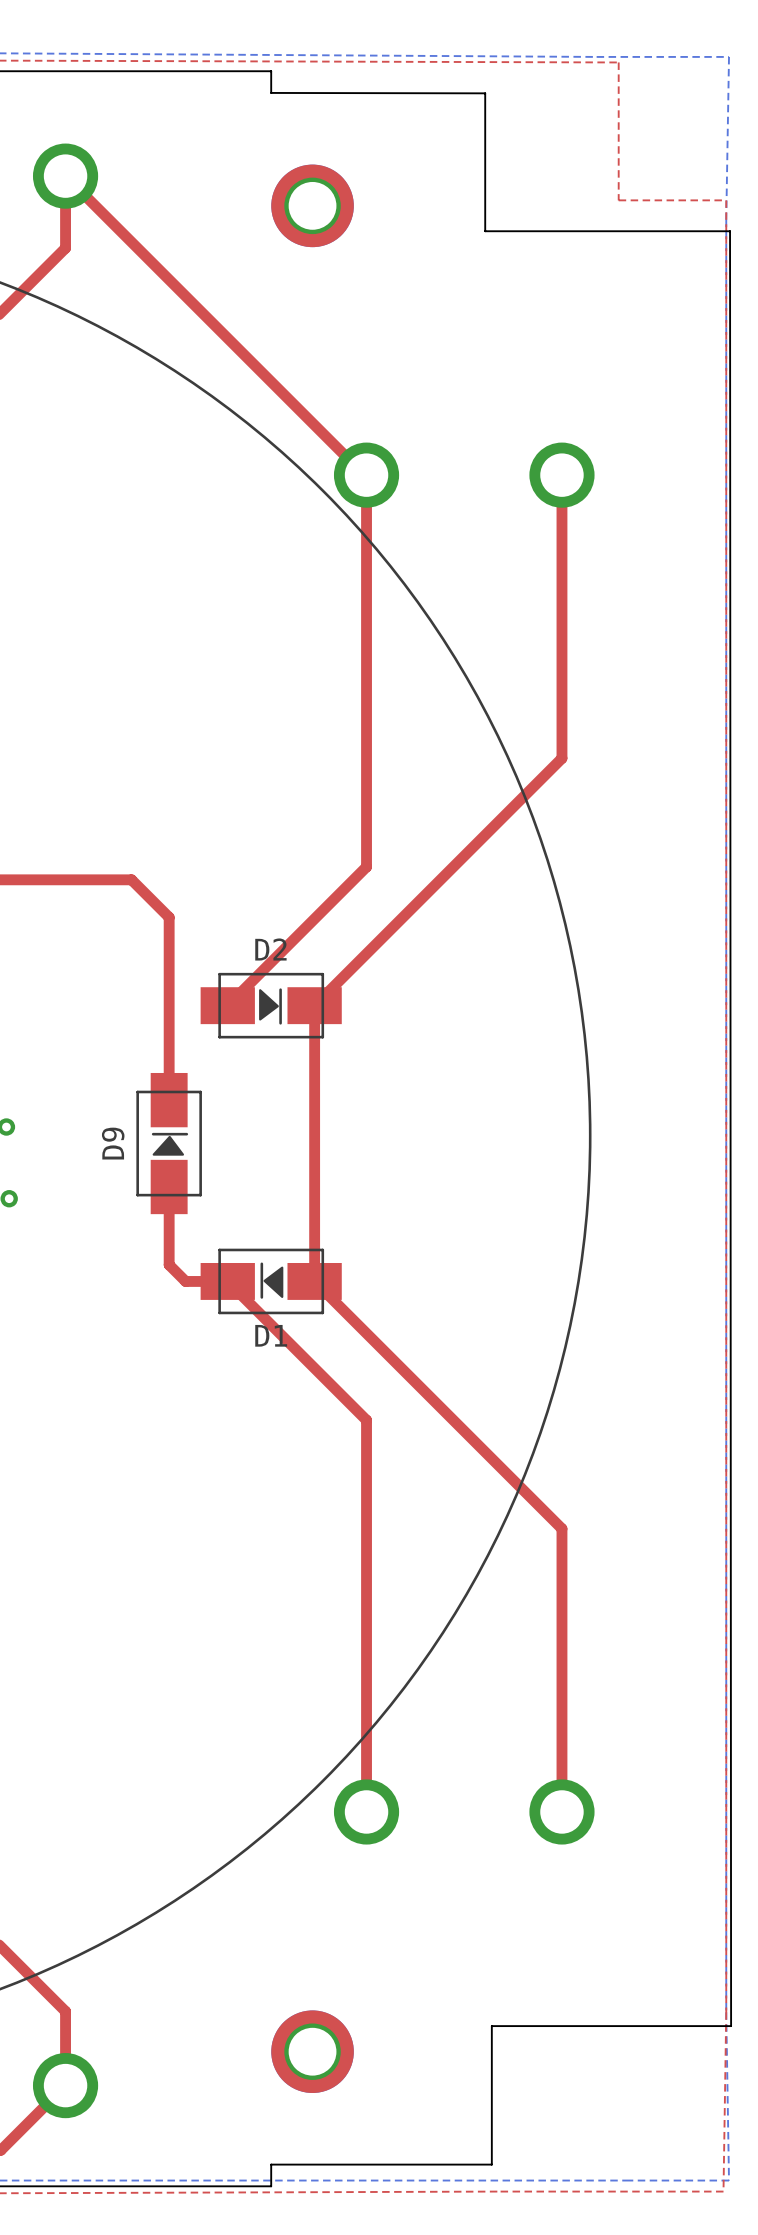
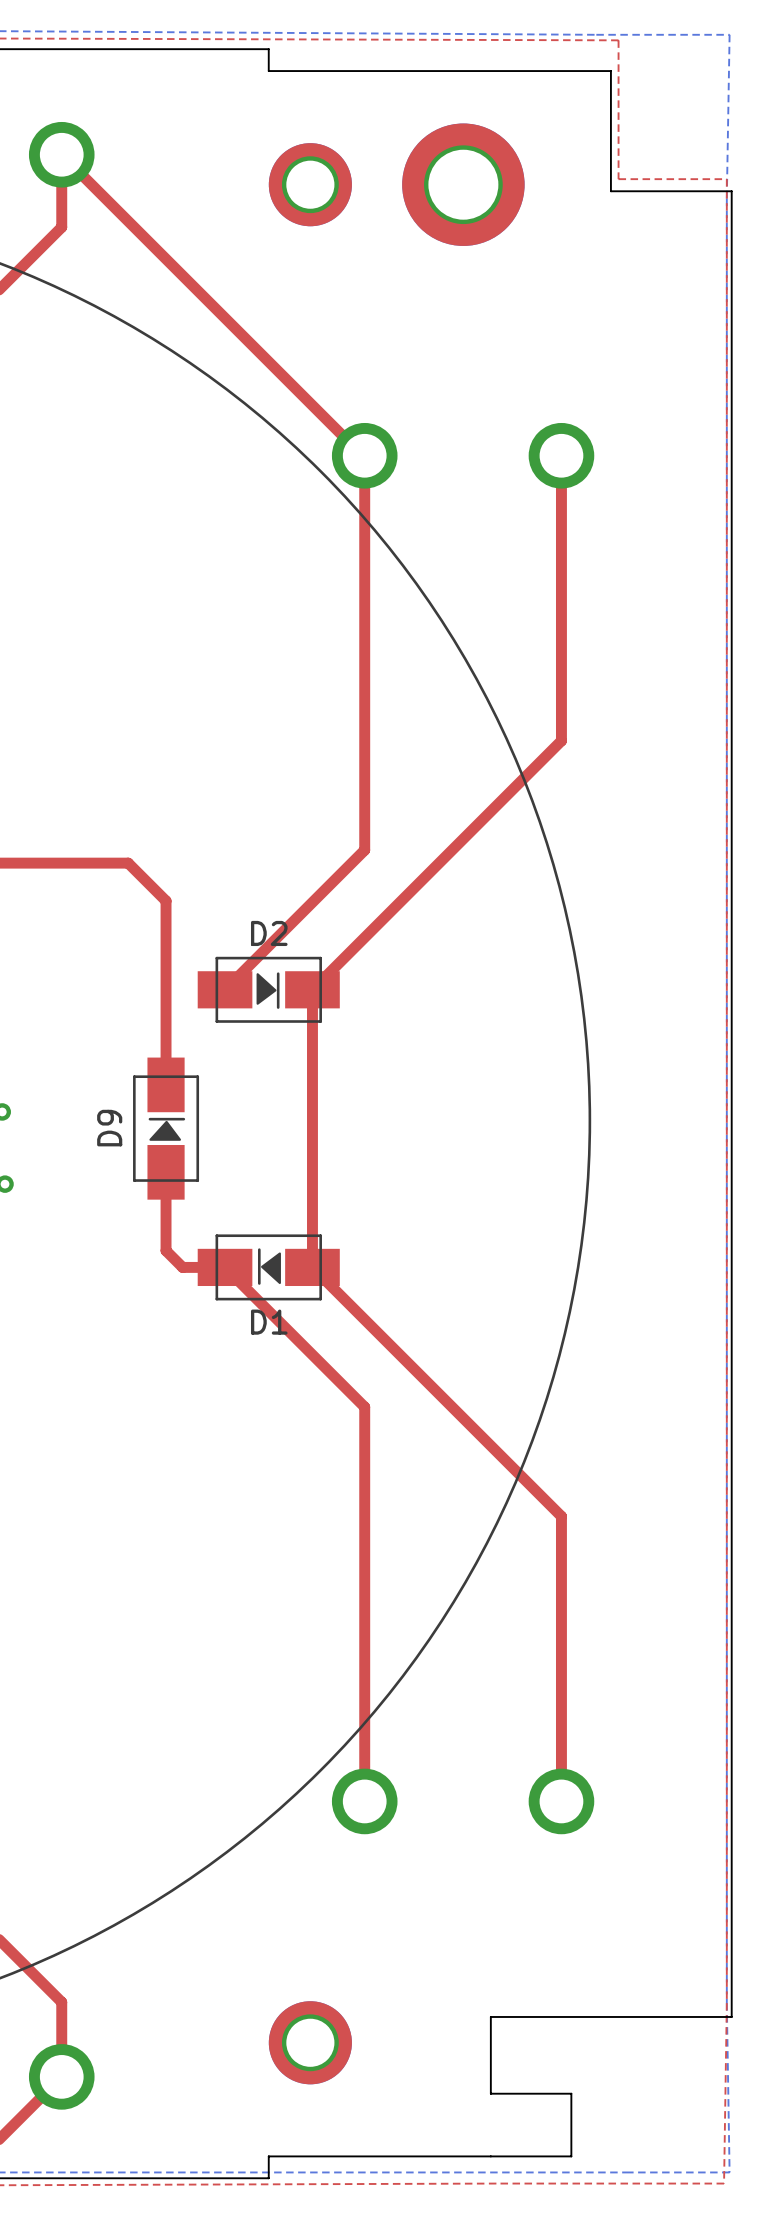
board edge: (271, 92) (485, 93) (485, 231) (730, 231) (731, 2026) -> (268, 71) (610, 71) (610, 191) (731, 191) (731, 2016)
part: none -> (463, 184)
board edge: (491, 2102) (491, 2164) -> (490, 2093) (571, 2093) (571, 2156) (490, 2156)

